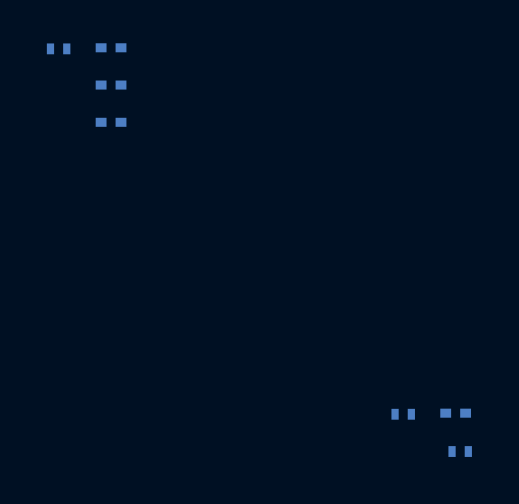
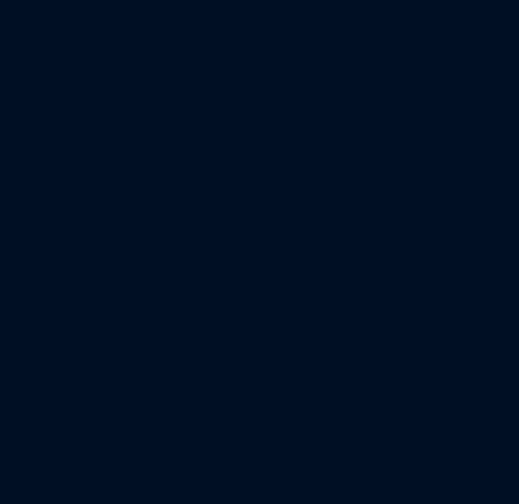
part: (111, 47) -> none
part: (58, 48) -> none
part: (111, 85) -> none
part: (111, 122) -> none
part: (455, 413) -> none
part: (403, 414) -> none
part: (460, 451) -> none

